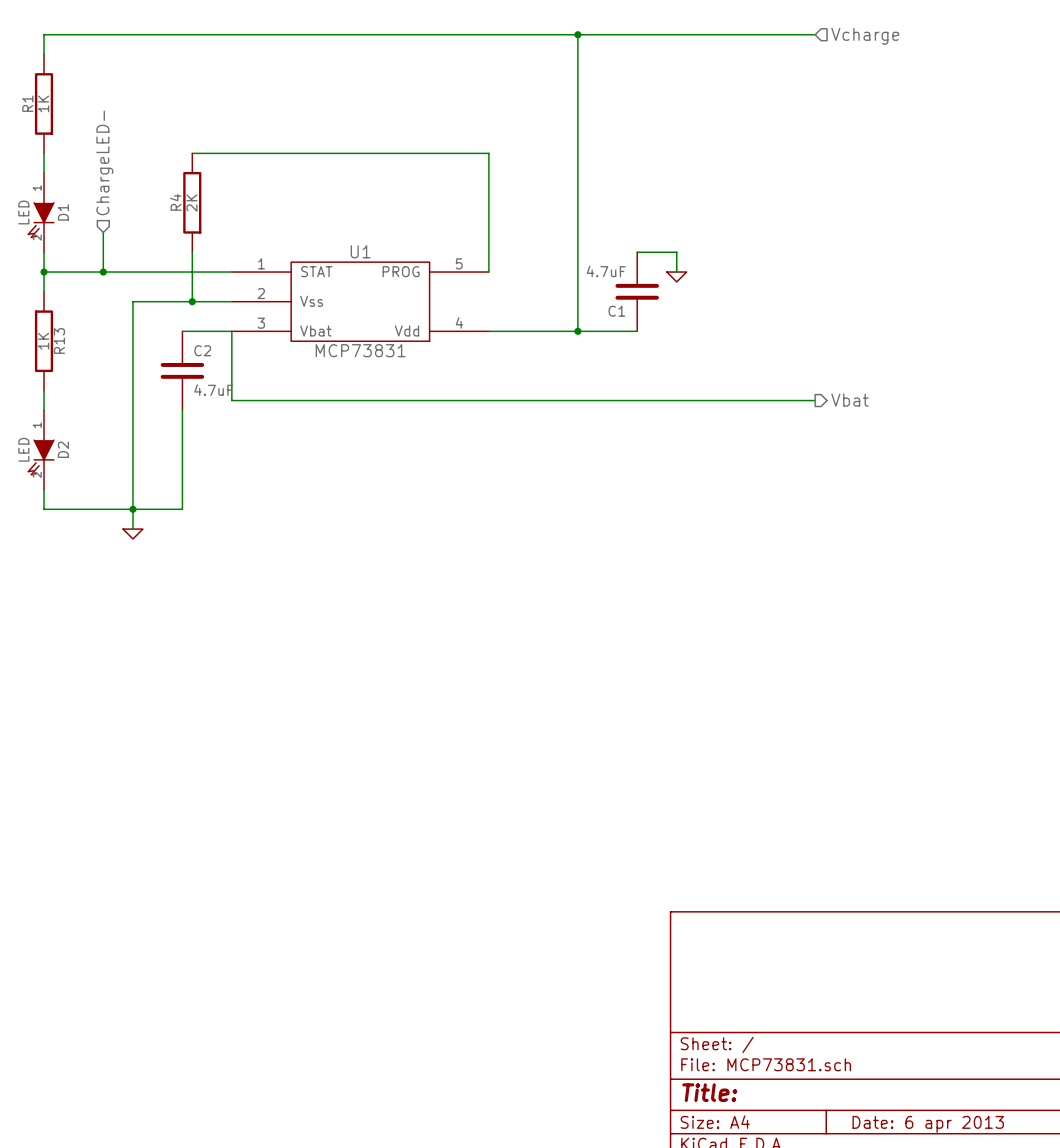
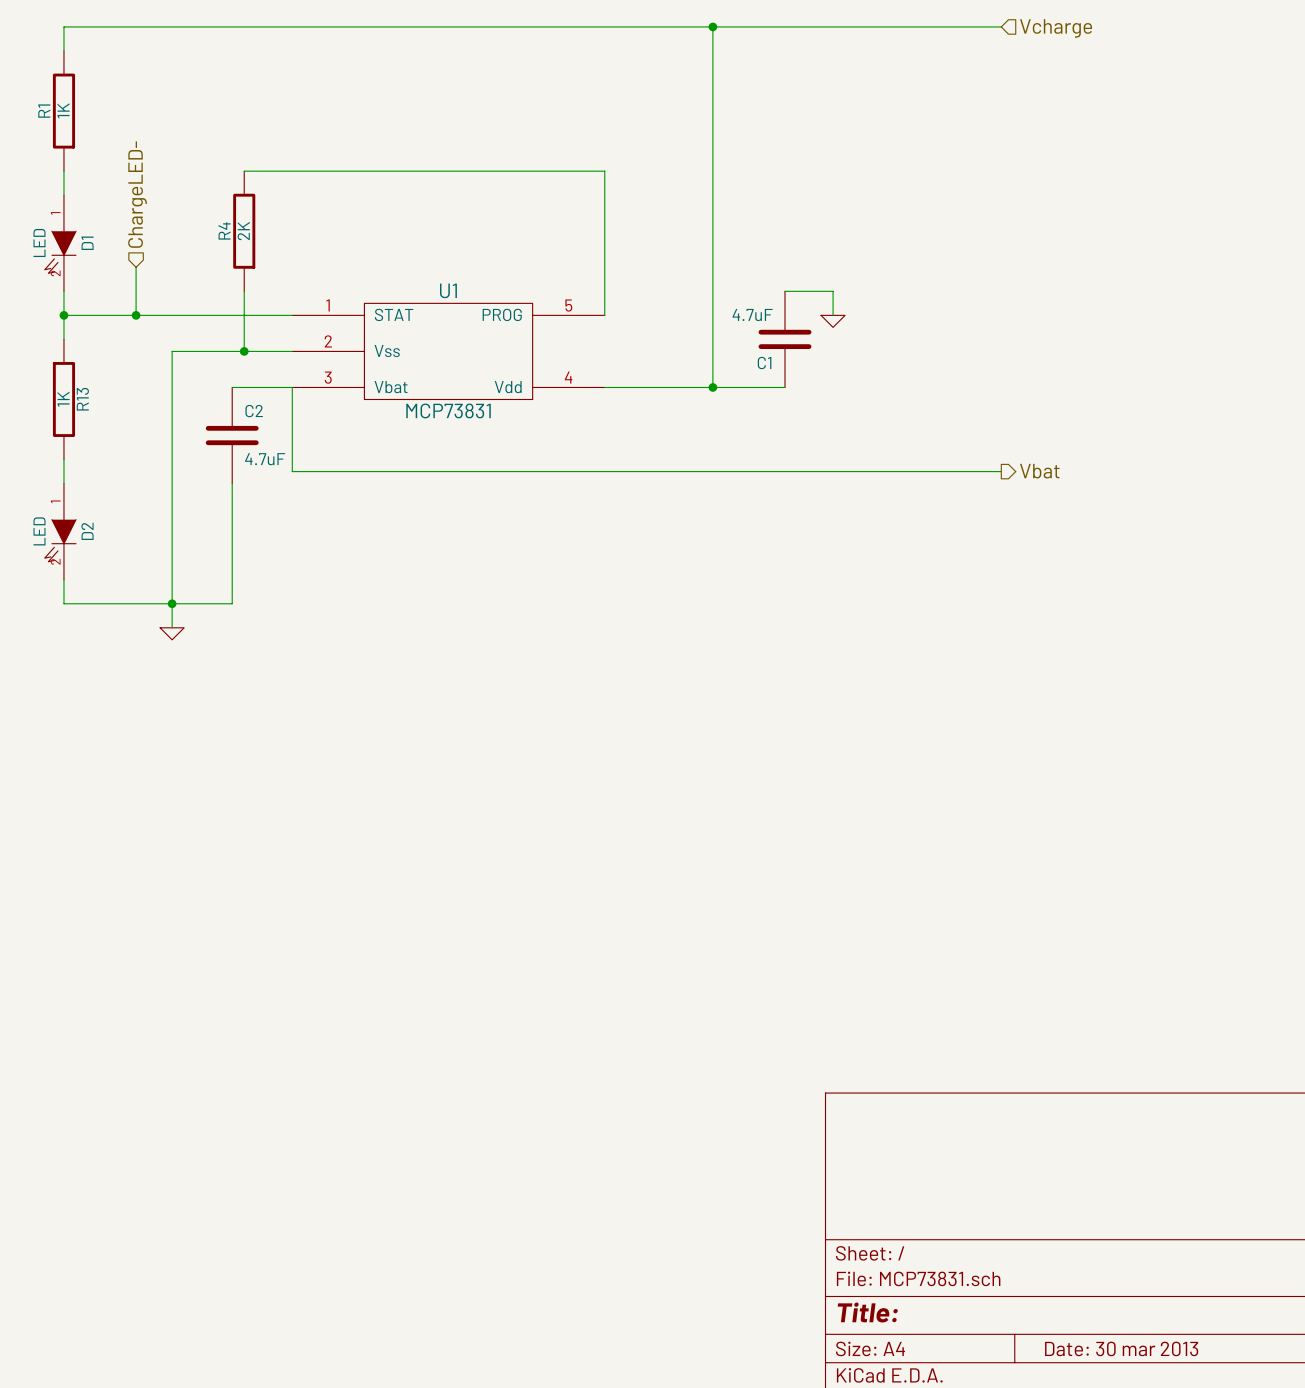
title block: Date: 6 apr 2013 (928, 1124) -> Date: 30 mar 2013 (1121, 1348)

